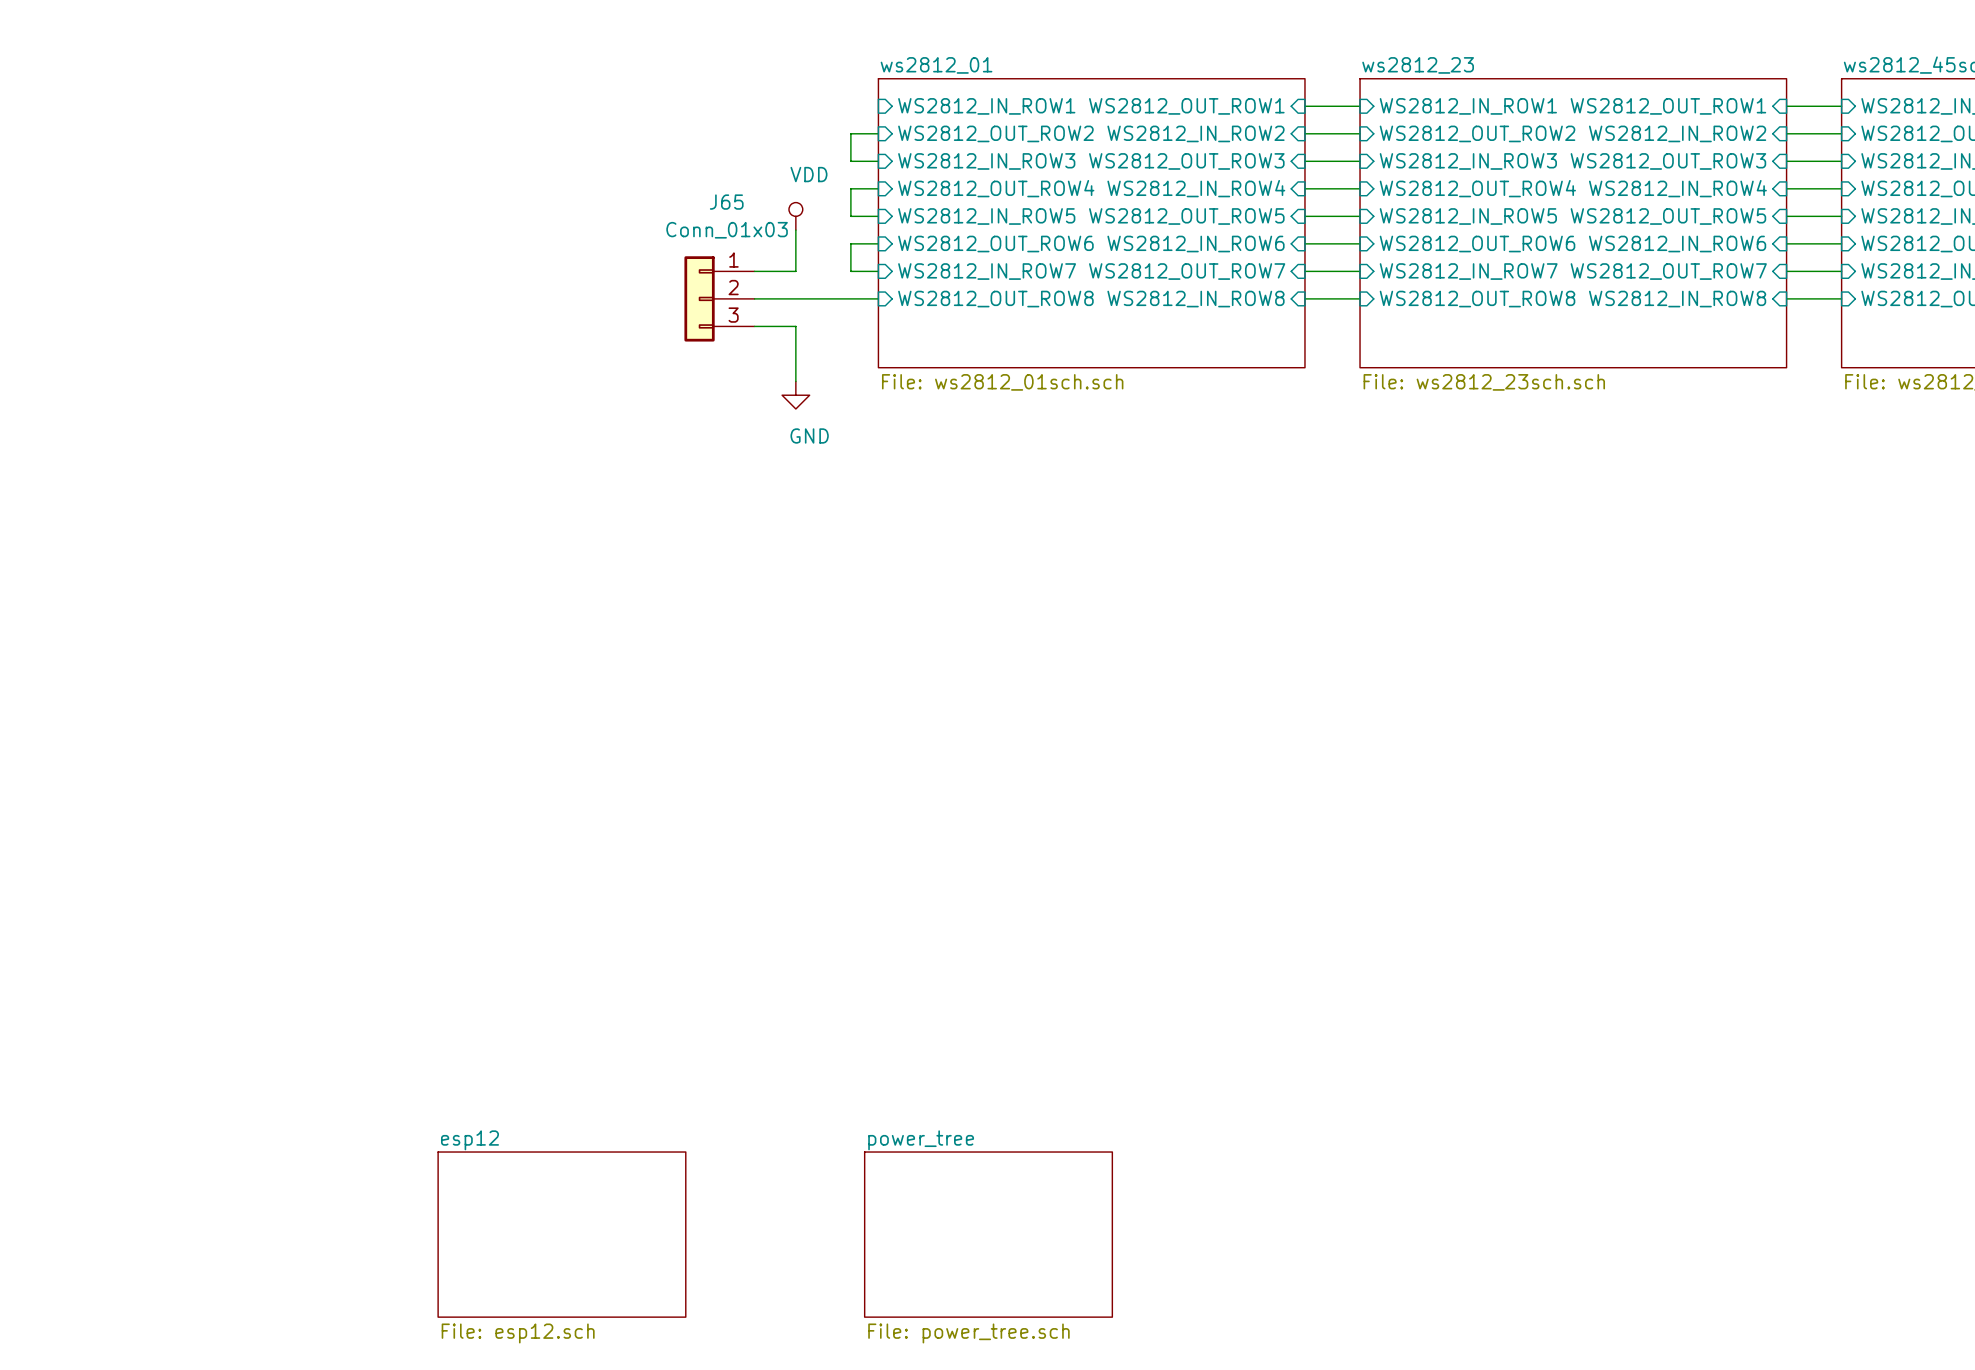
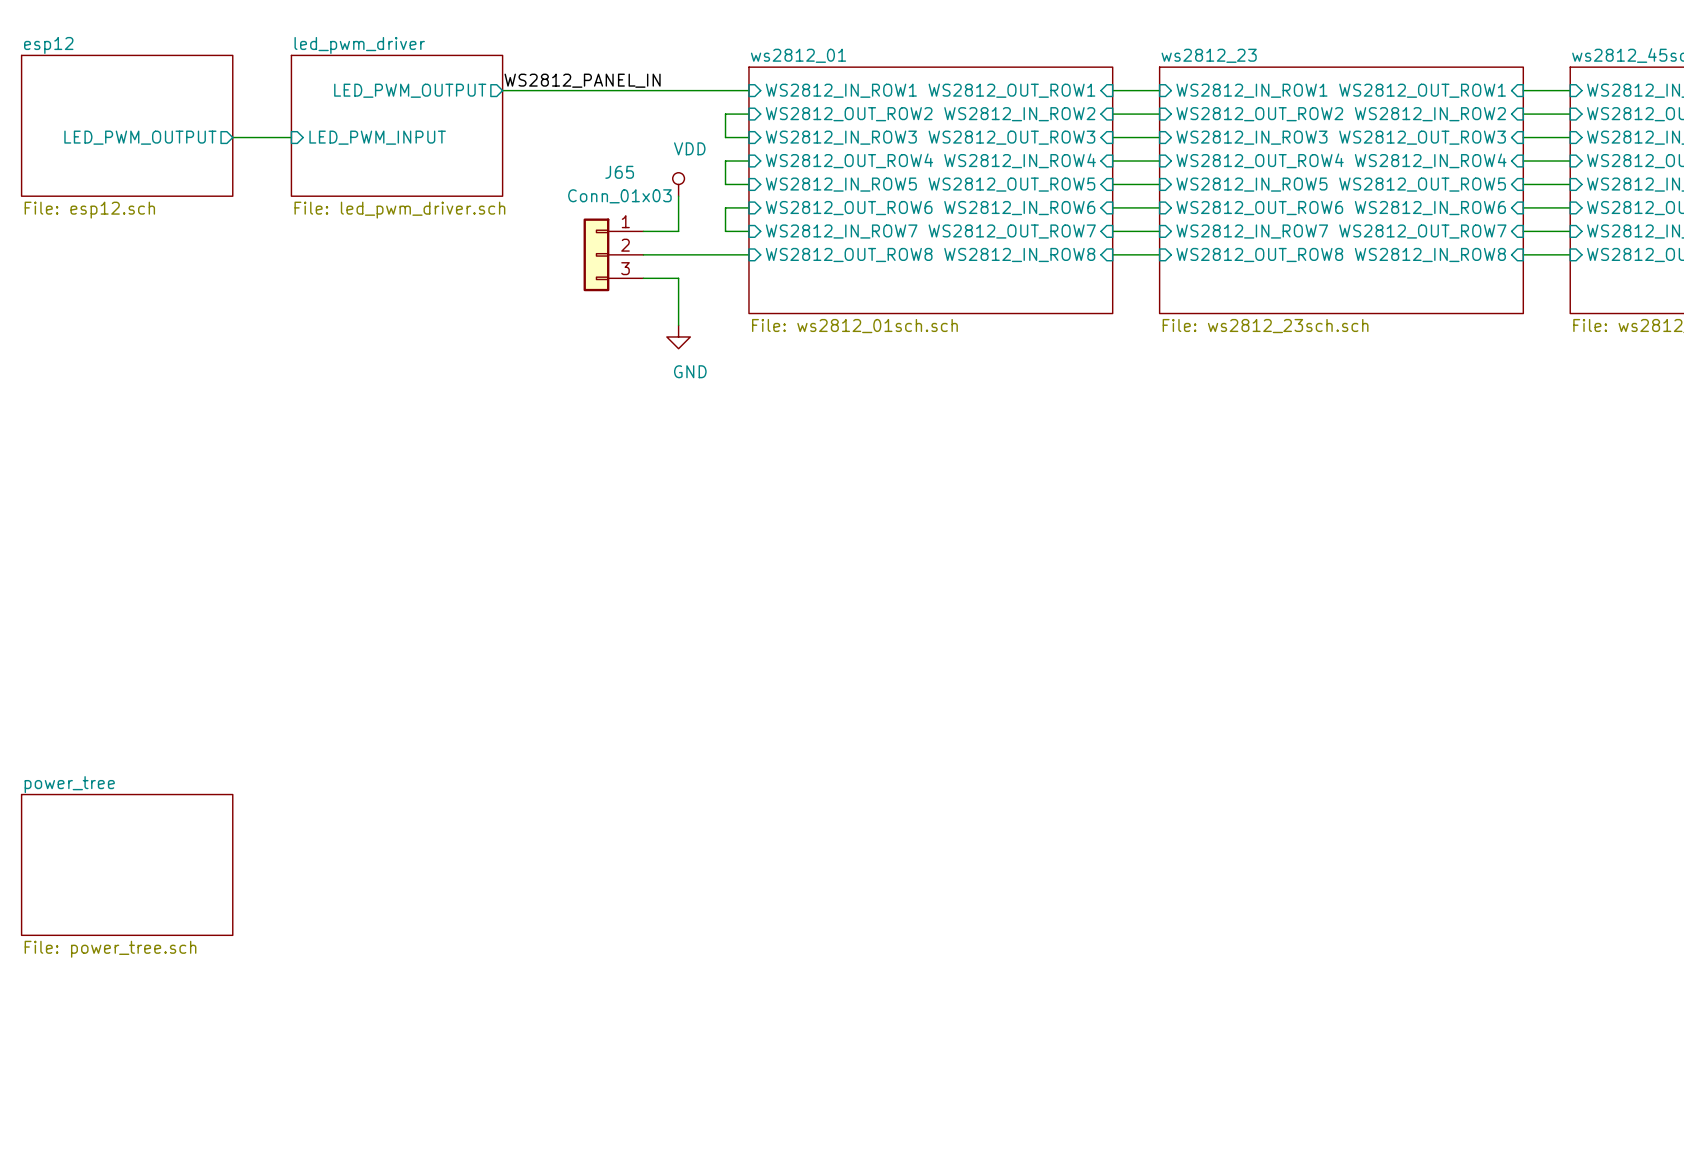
label: none -> WS2812_PANEL_IN (582, 80)
sheet pin: none -> LED_PWM_OUTPUT (410, 90)
wire: none -> (502, 90) (748, 90)
sheet led_pwm_driver: none -> File: led_pwm_driver.sch (397, 125)
sheet pin: none -> LED_PWM_OUTPUT (140, 137)
wire: none -> (232, 137) (291, 137)
sheet pin: none -> LED_PWM_INPUT (377, 137)
sheet power_tree: none -> File: power_tree.sch (127, 864)
sheet esp12 position: (561, 1234) -> (127, 125)
sheet power_tree: File: power_tree.sch (988, 1234) -> none

